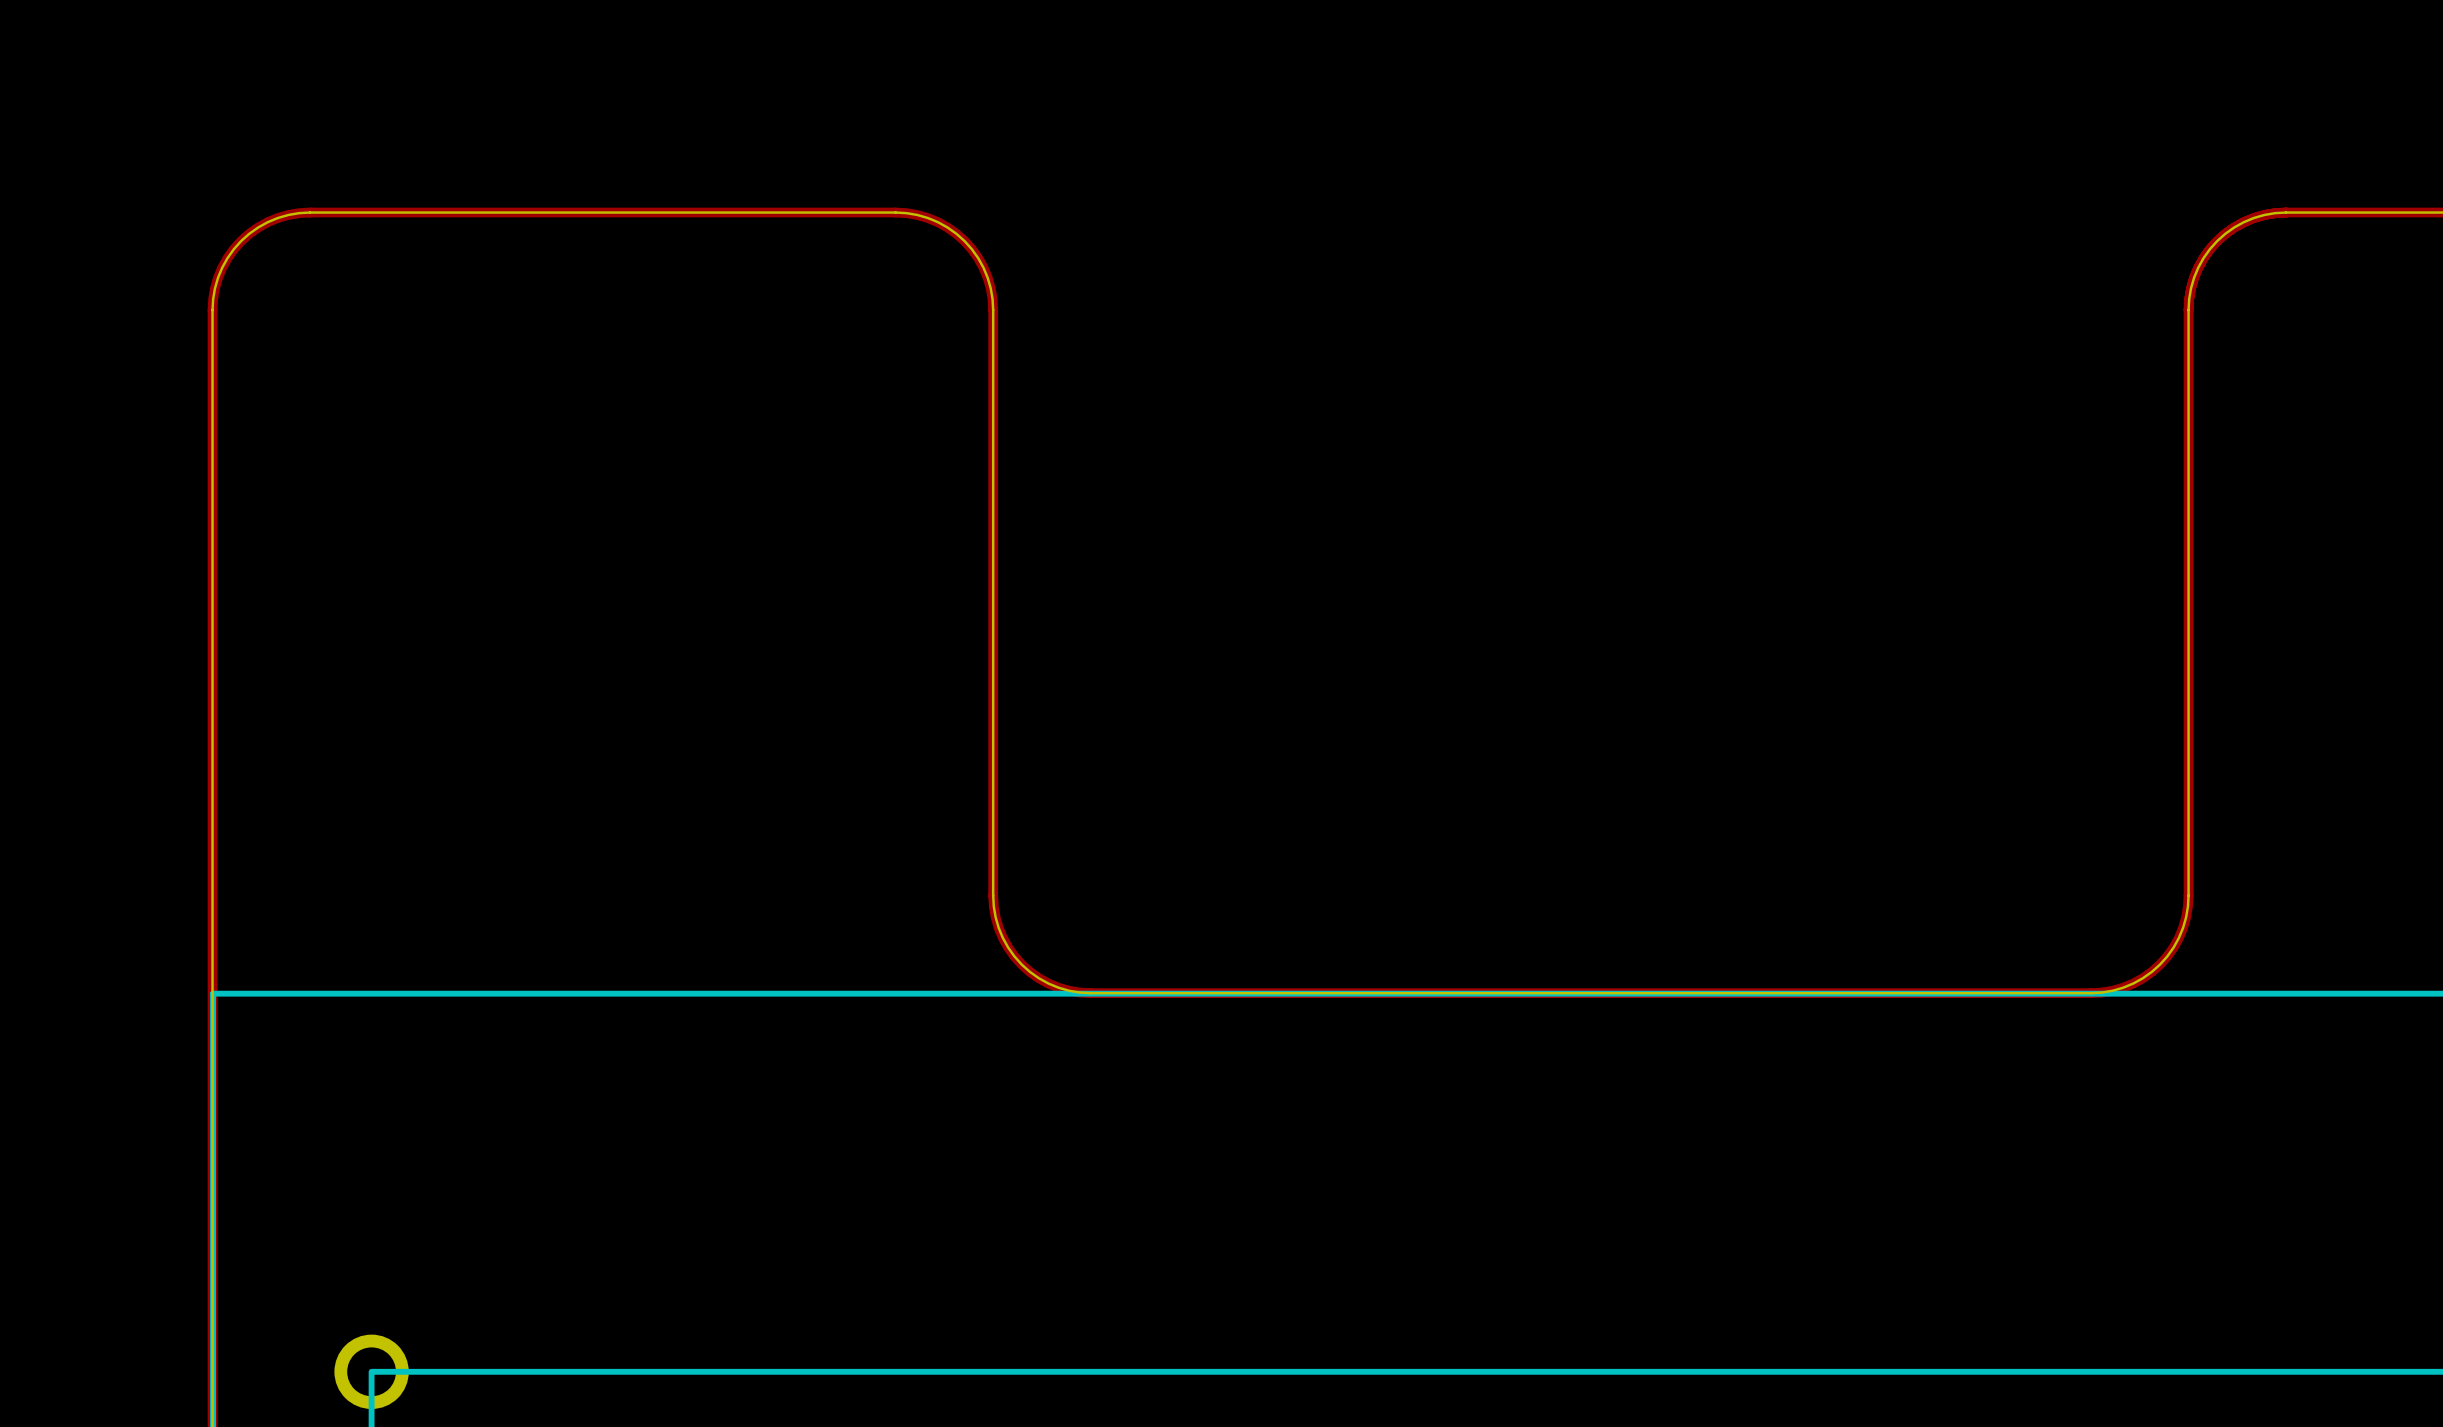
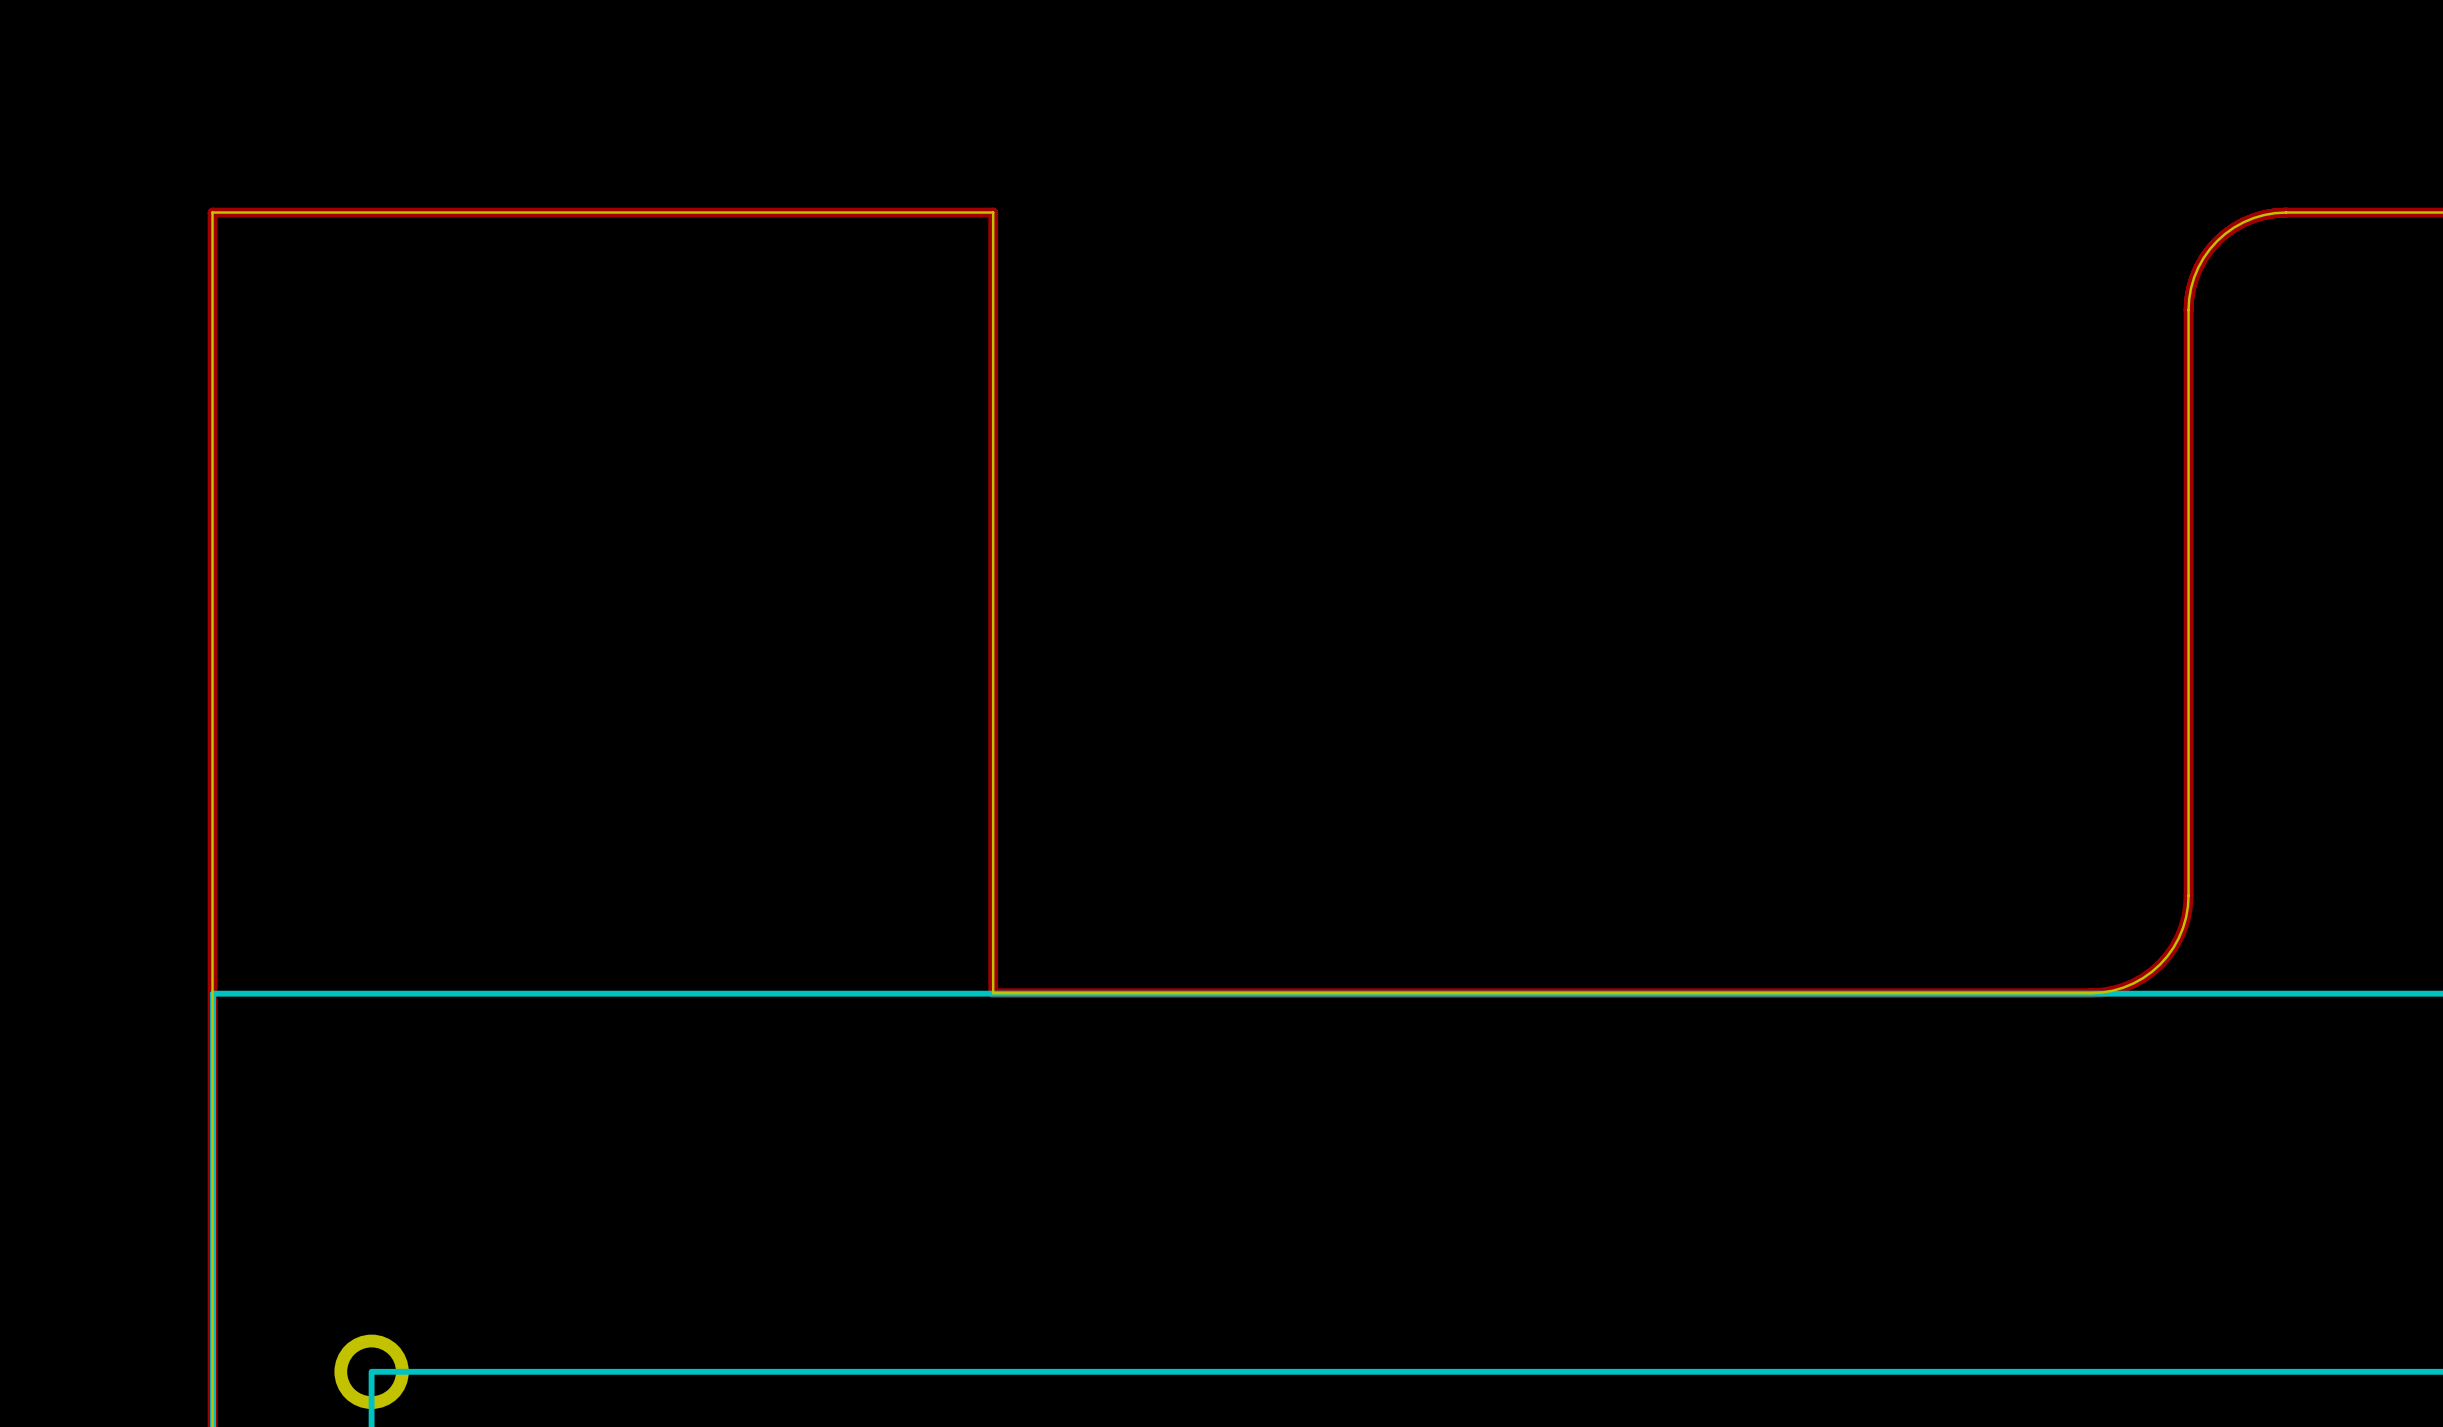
track: (310, 212) (288, 214) (267, 222) (241, 241) (222, 267) (214, 288) (212, 310) -> (310, 212) (212, 212) (212, 310)
board edge: (310, 212) (288, 214) (267, 222) (241, 241) (222, 267) (214, 288) (212, 310) -> (310, 212) (212, 212) (212, 310)
track: (895, 212) (917, 214) (937, 222) (964, 241) (978, 258) (987, 277) (993, 310) -> (895, 212) (993, 212) (993, 310)
board edge: (895, 212) (917, 214) (937, 222) (964, 241) (978, 258) (987, 277) (993, 310) -> (895, 212) (993, 212) (993, 310)
track: (993, 895) (998, 927) (1008, 947) (1021, 964) (1038, 978) (1058, 987) (1090, 993) -> (993, 895) (993, 993) (1090, 993)
board edge: (993, 895) (998, 927) (1008, 947) (1021, 964) (1038, 978) (1058, 987) (1090, 993) -> (993, 895) (993, 993) (1090, 993)

